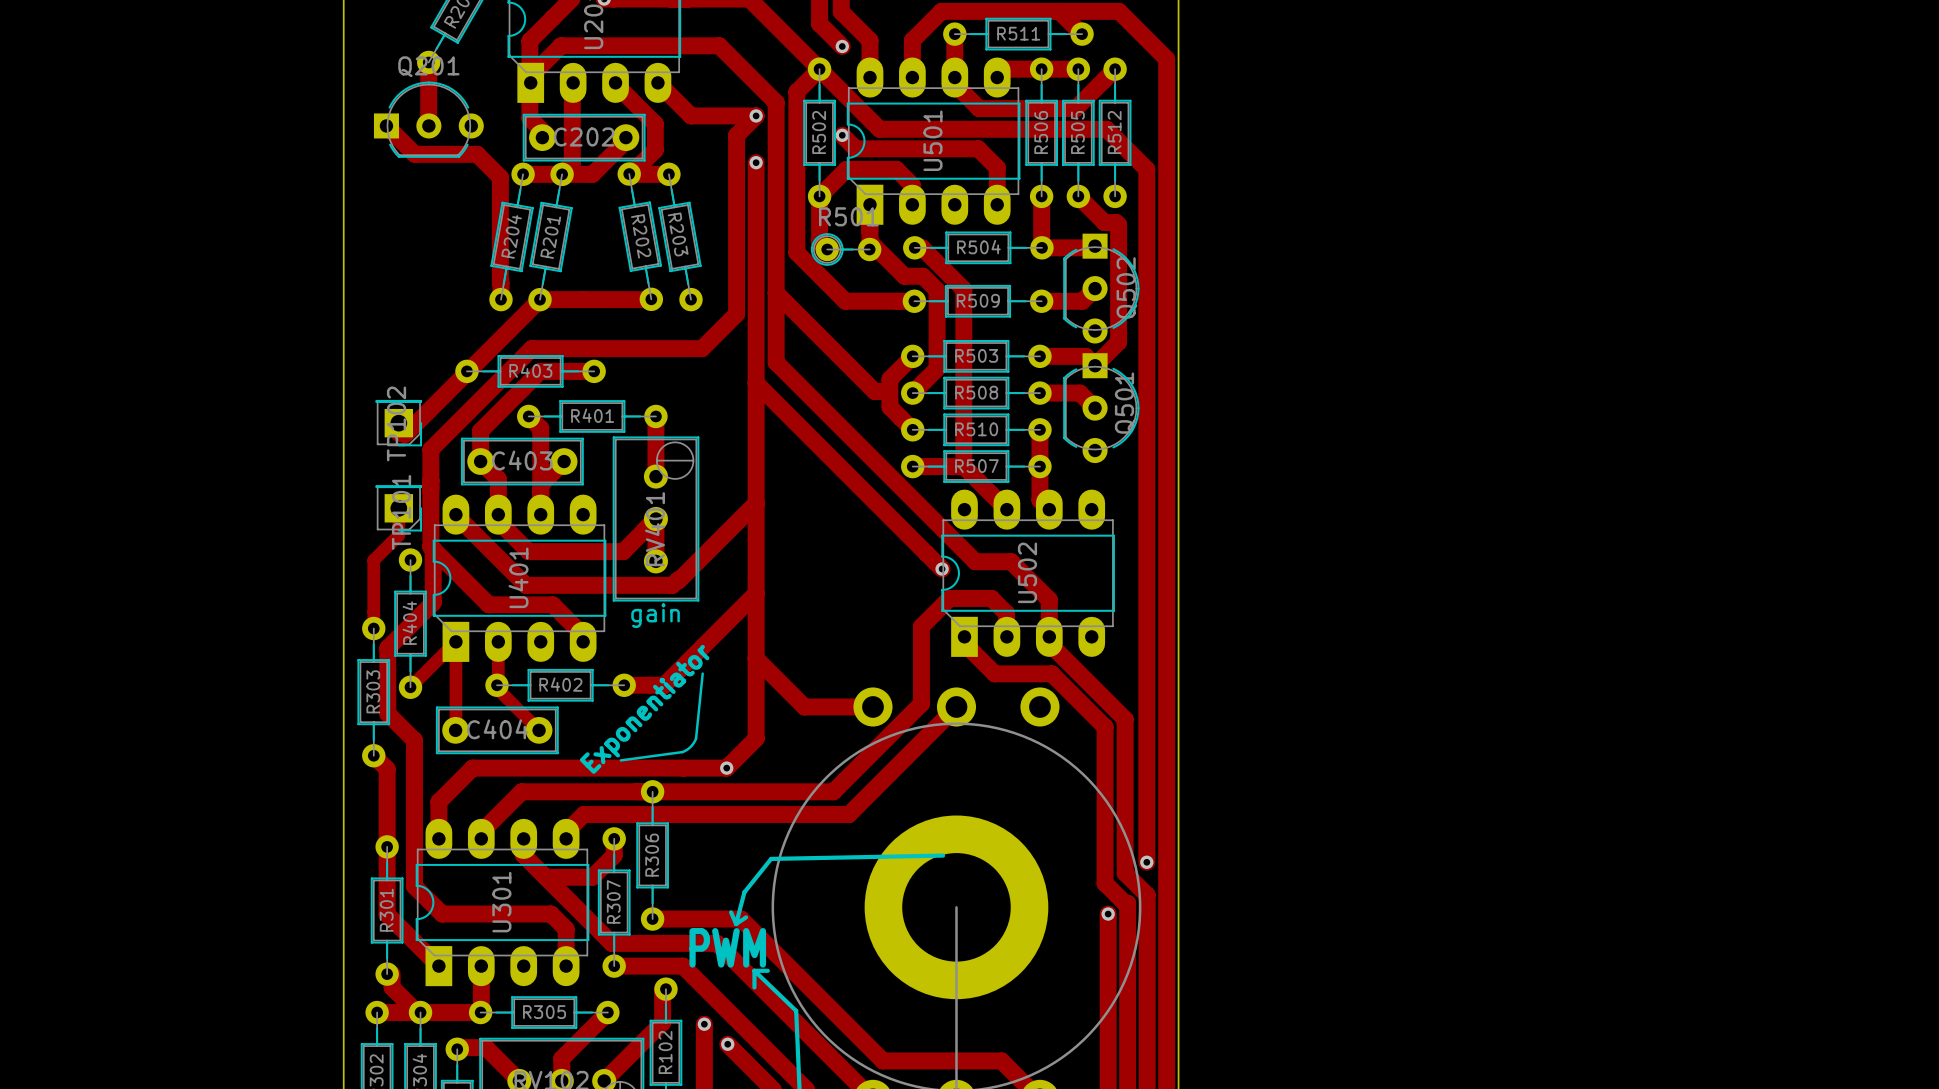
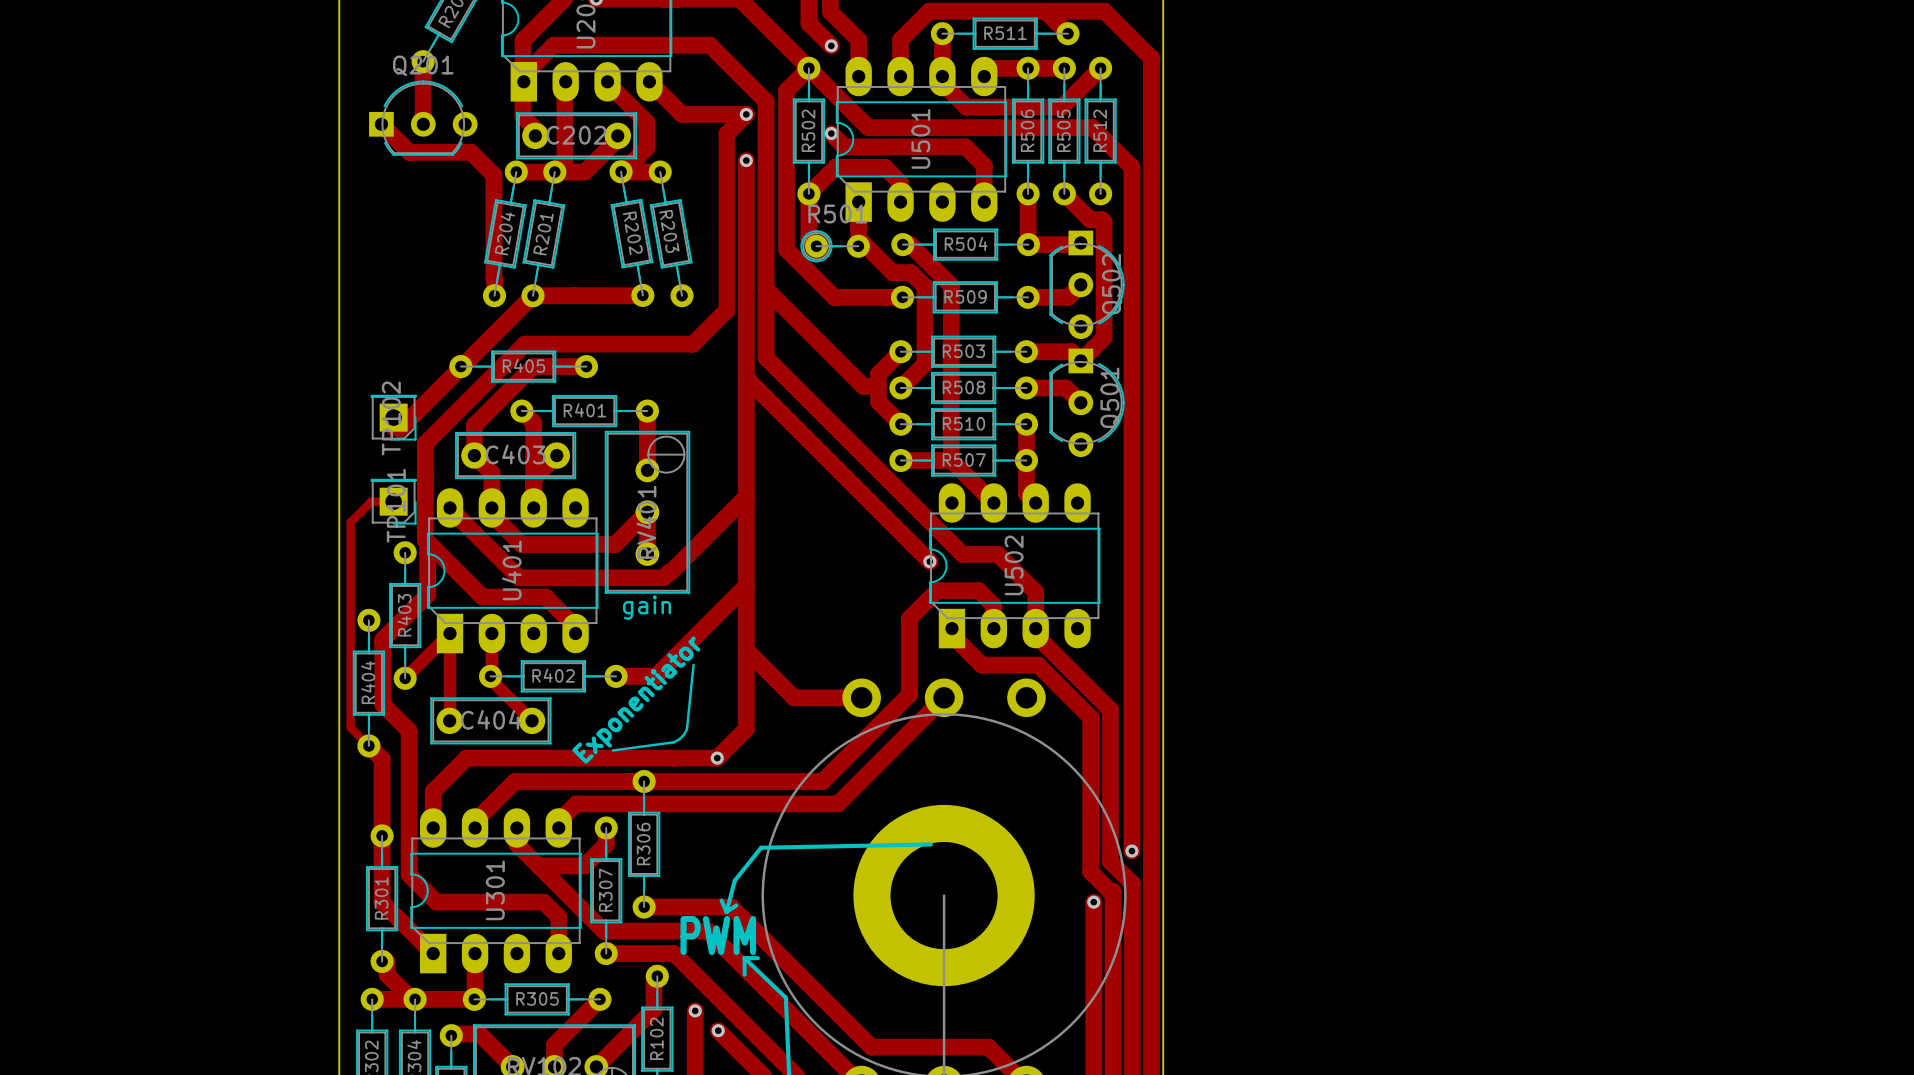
R403 name: R403 (530, 370) -> R405 (523, 365)
track: (398, 508) (398, 535) (373, 560) (373, 628) -> (393, 501) (371, 501) (350, 522) (350, 727) (368, 745)
R404 name: R404 (409, 623) -> R403 (404, 615)
R303 name: R303 (373, 691) -> R404 (368, 682)

